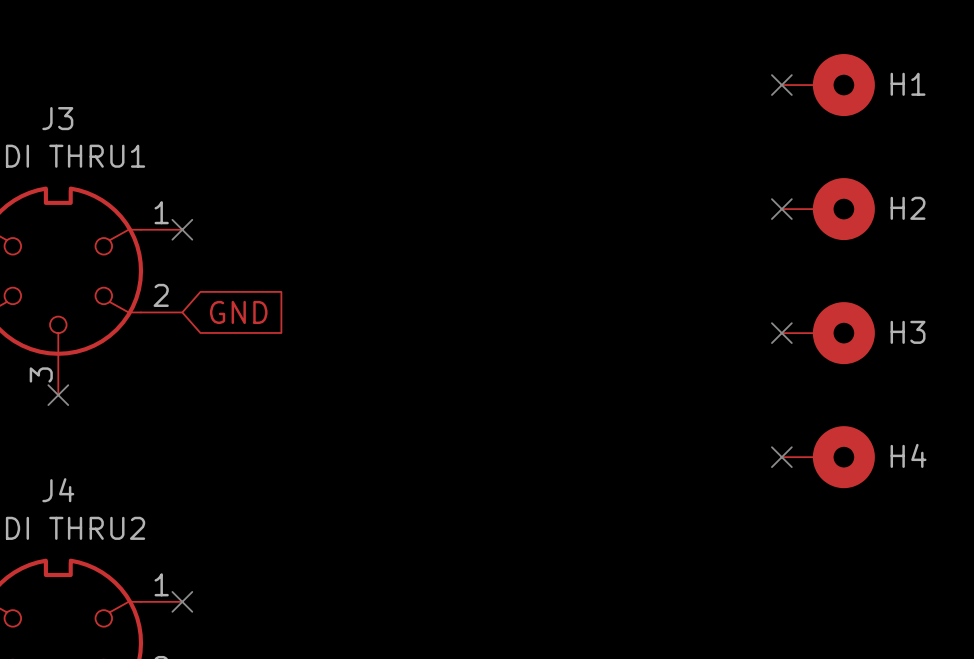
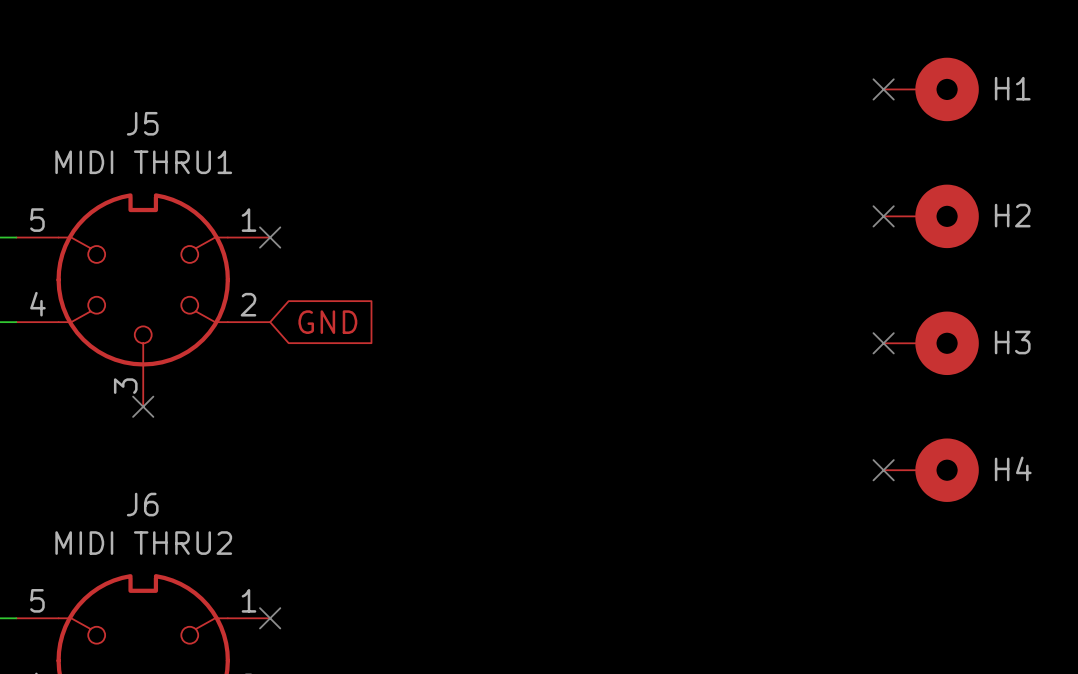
J3 name: J3 (57, 118) -> J5 (142, 123)
J4 name: J4 (58, 490) -> J6 (142, 504)

